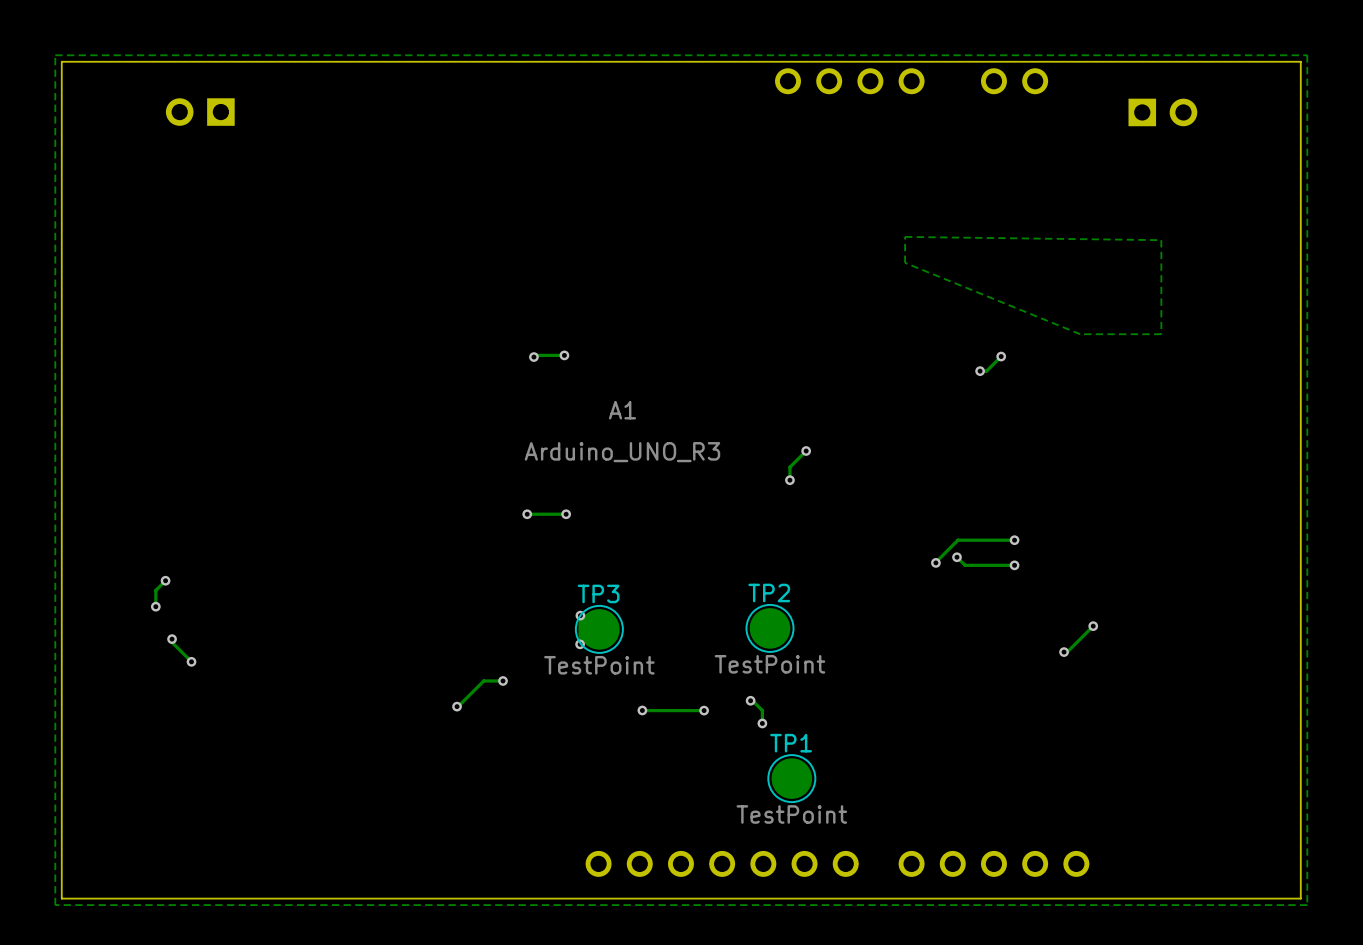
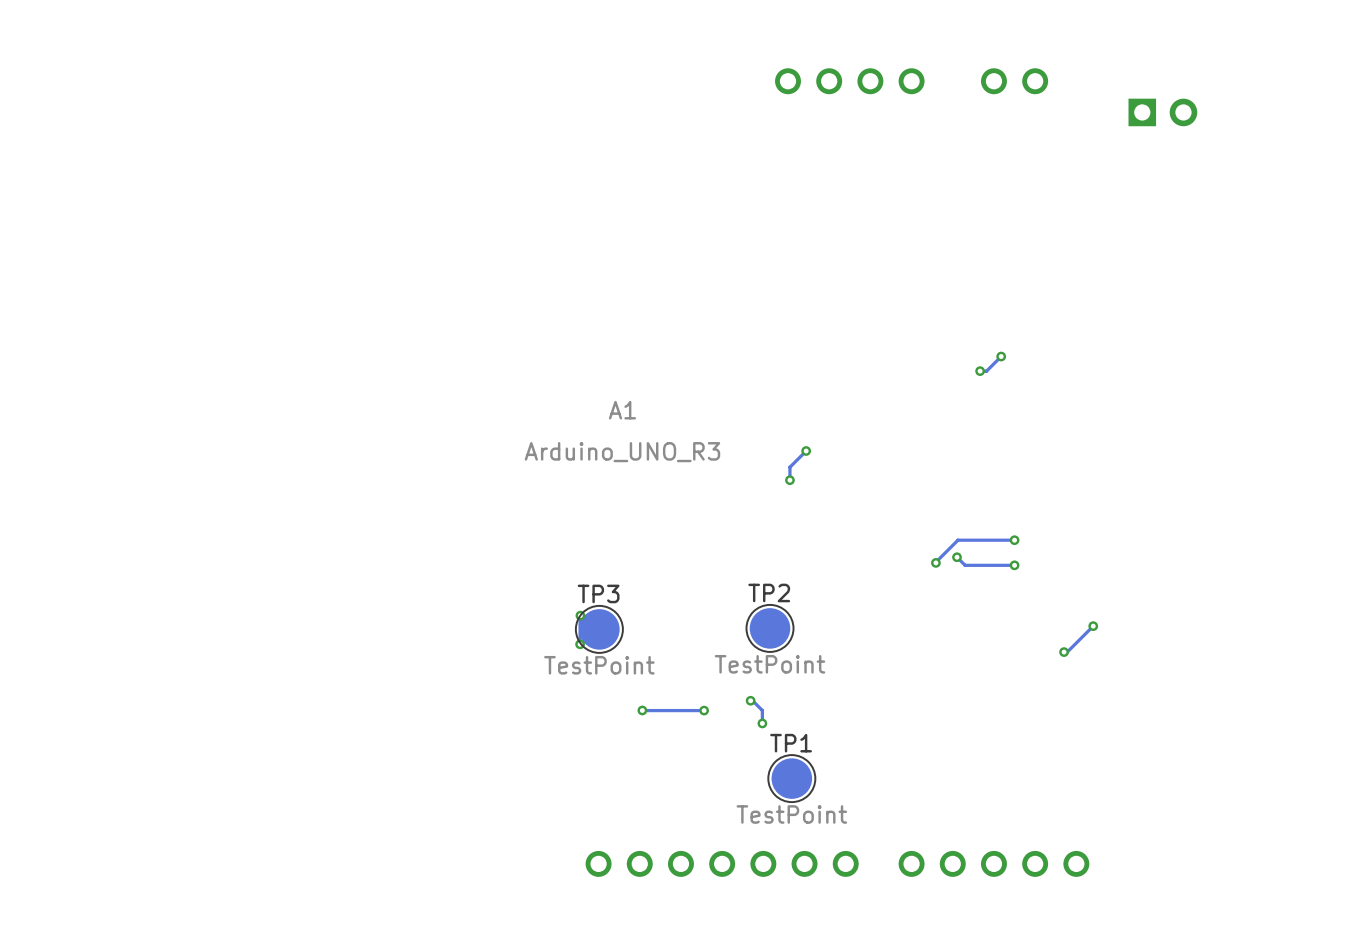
zone outline: (1307, 55) (1307, 905) (55, 905) (55, 55) (1307, 55) -> none
board edge: (1300, 61) (61, 61) (61, 898) (1300, 898) (1300, 61) -> none
part: (200, 112) -> none
zone outline: (905, 236) (905, 262) (1080, 334) (1161, 334) (1161, 240) (905, 236) -> none
track: (564, 355) (535, 355) (533, 357) -> none
via: (564, 355) -> none
via: (533, 357) -> none
via: (527, 514) -> none
track: (566, 514) (527, 514) -> none
via: (566, 514) -> none
track: (165, 580) (155, 590) (155, 606) -> none
via: (165, 580) -> none
via: (155, 606) -> none
track: (172, 639) (172, 642) (191, 661) -> none
via: (172, 639) -> none
via: (191, 661) -> none
track: (503, 680) (483, 680) (457, 706) -> none
via: (503, 680) -> none
via: (457, 706) -> none

